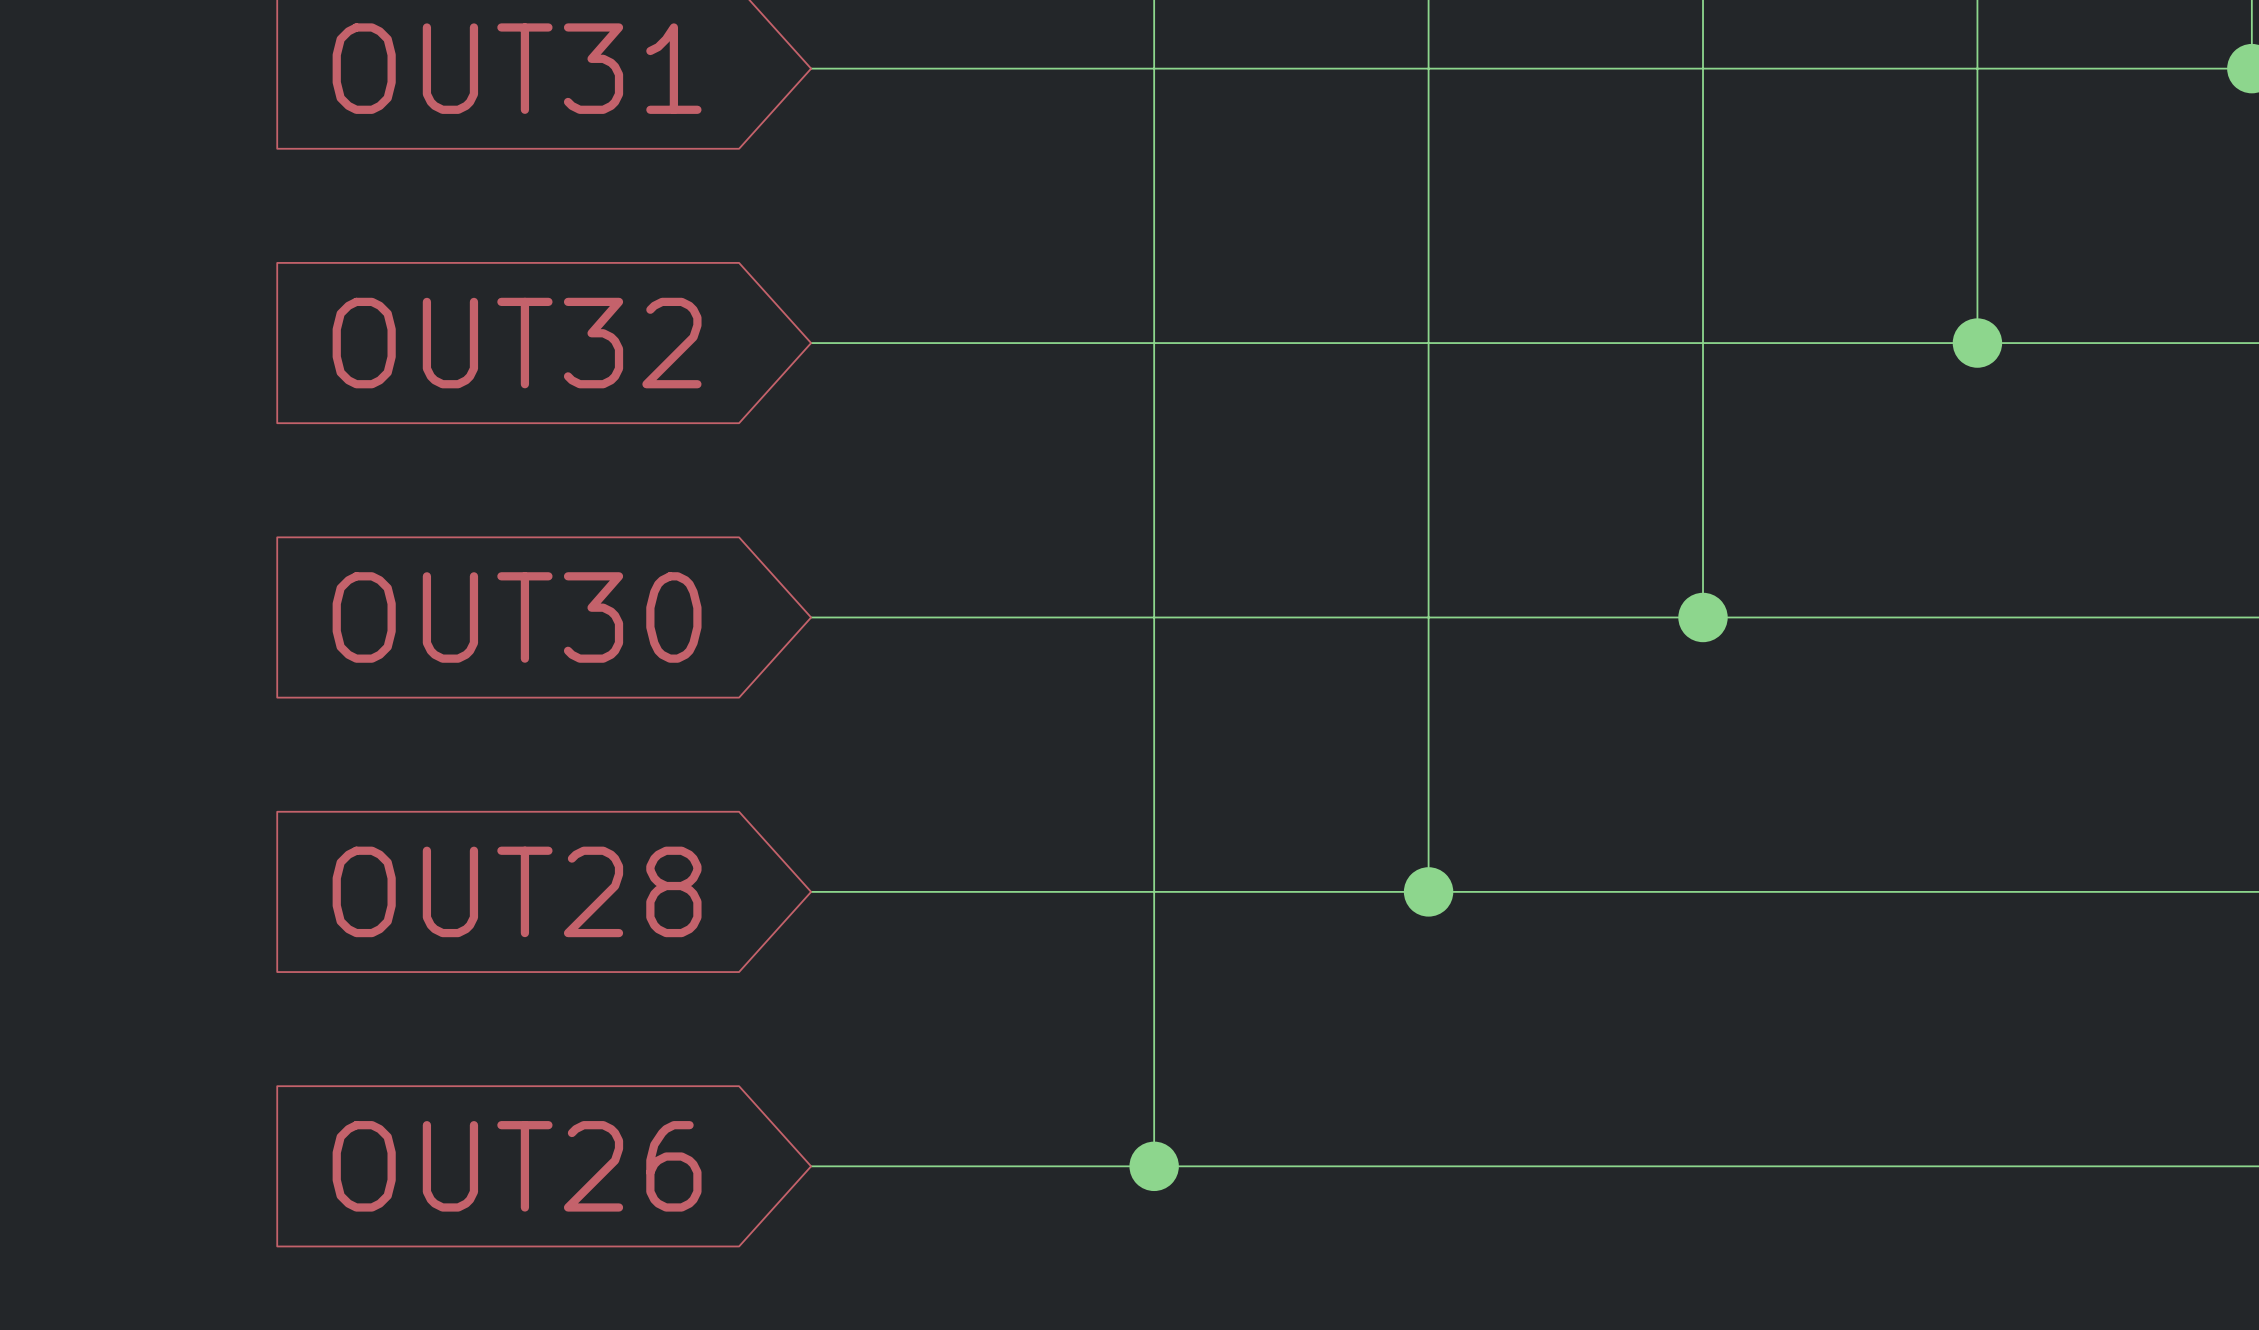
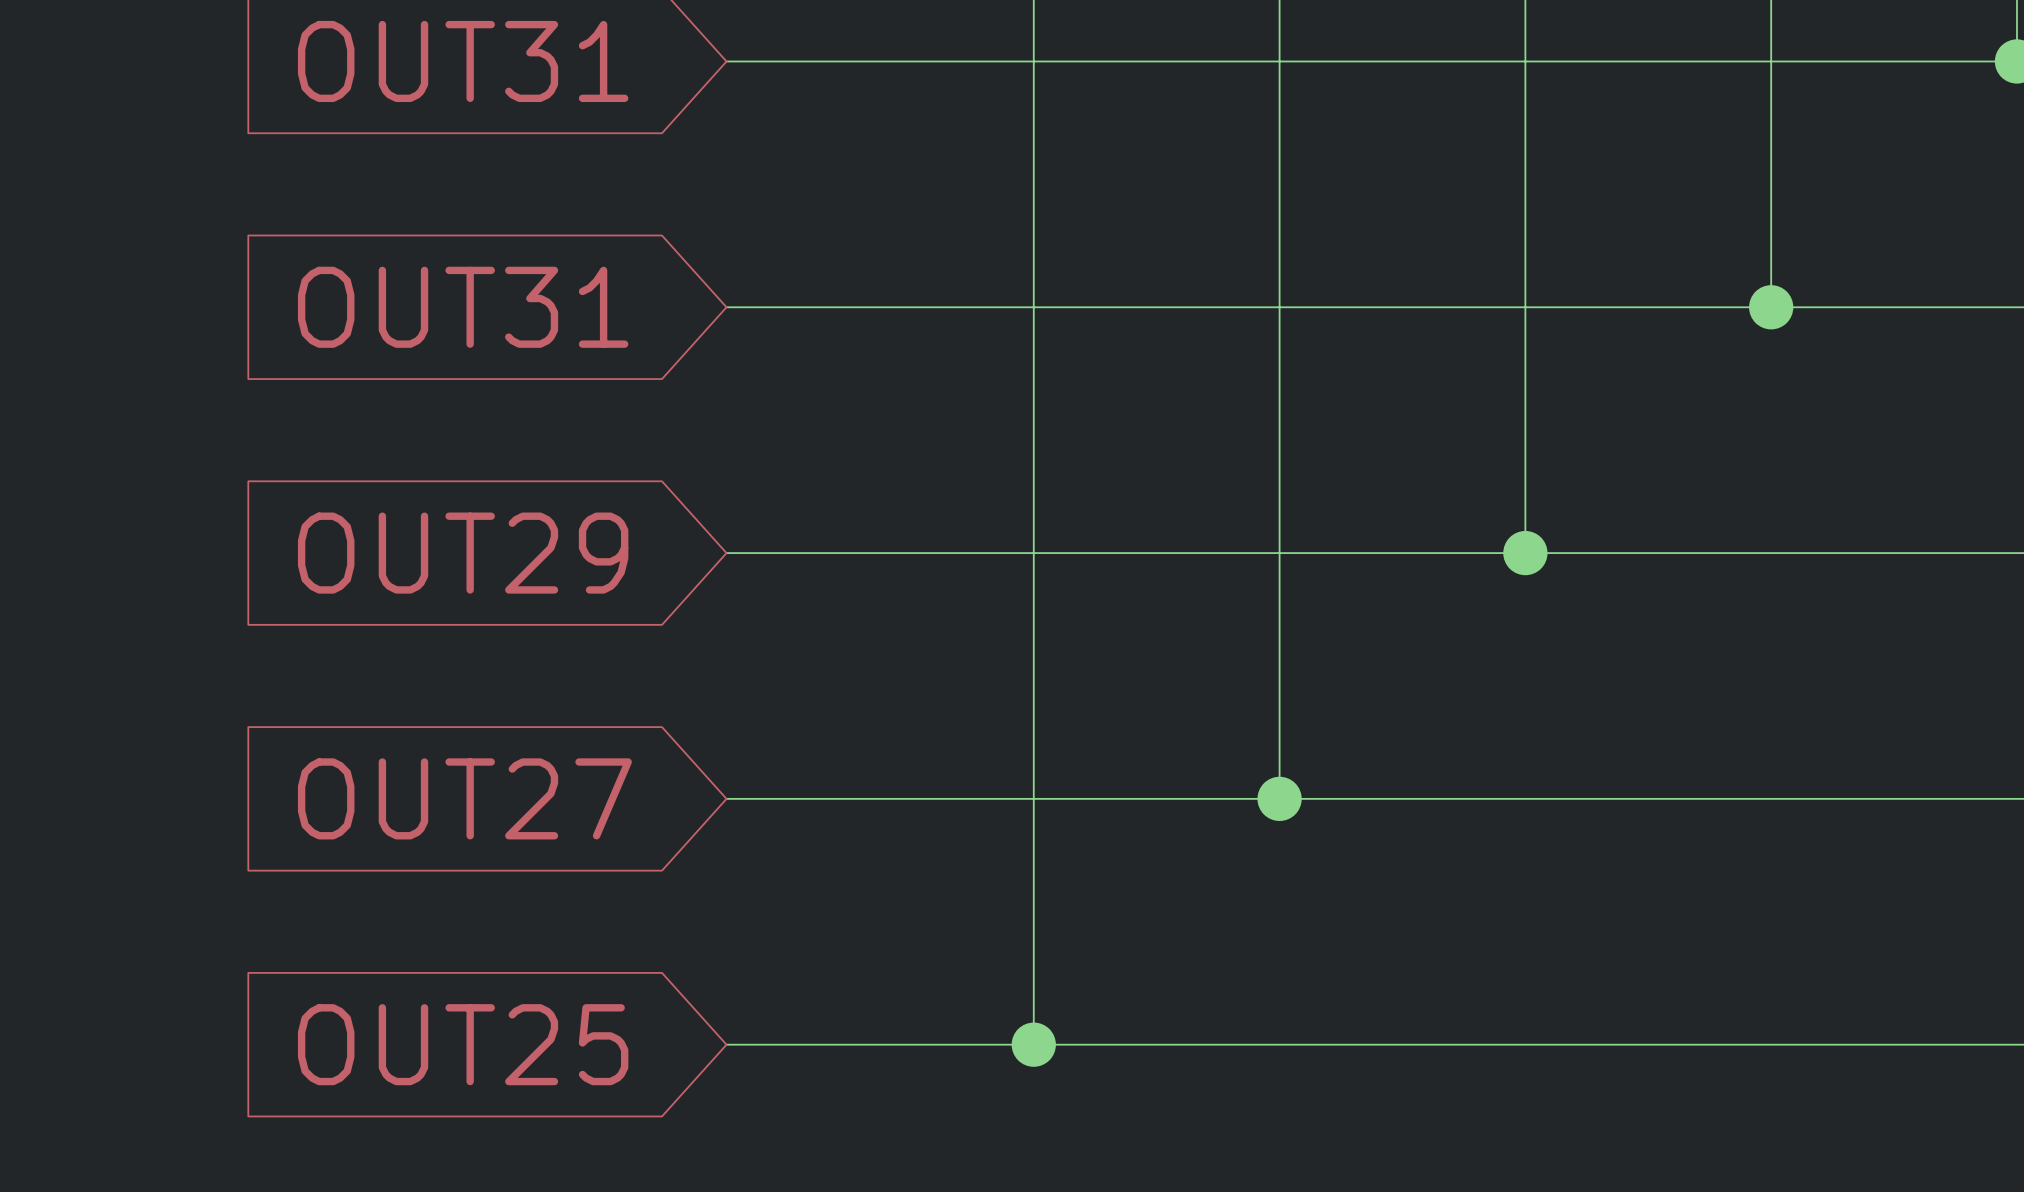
global label: OUT32 (517, 343) -> OUT31 (463, 307)
global label: OUT30 (517, 617) -> OUT29 (463, 553)
global label: OUT28 (517, 891) -> OUT27 (464, 798)
global label: OUT26 (517, 1166) -> OUT25 (463, 1044)

